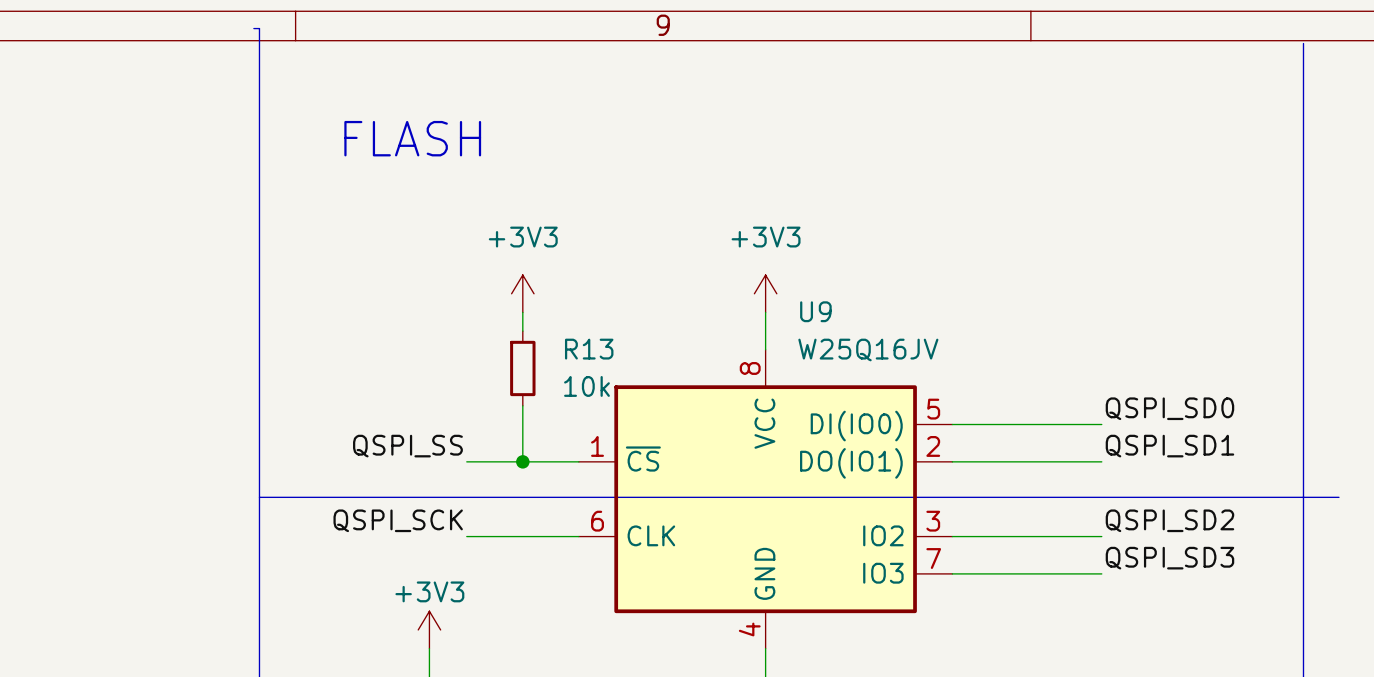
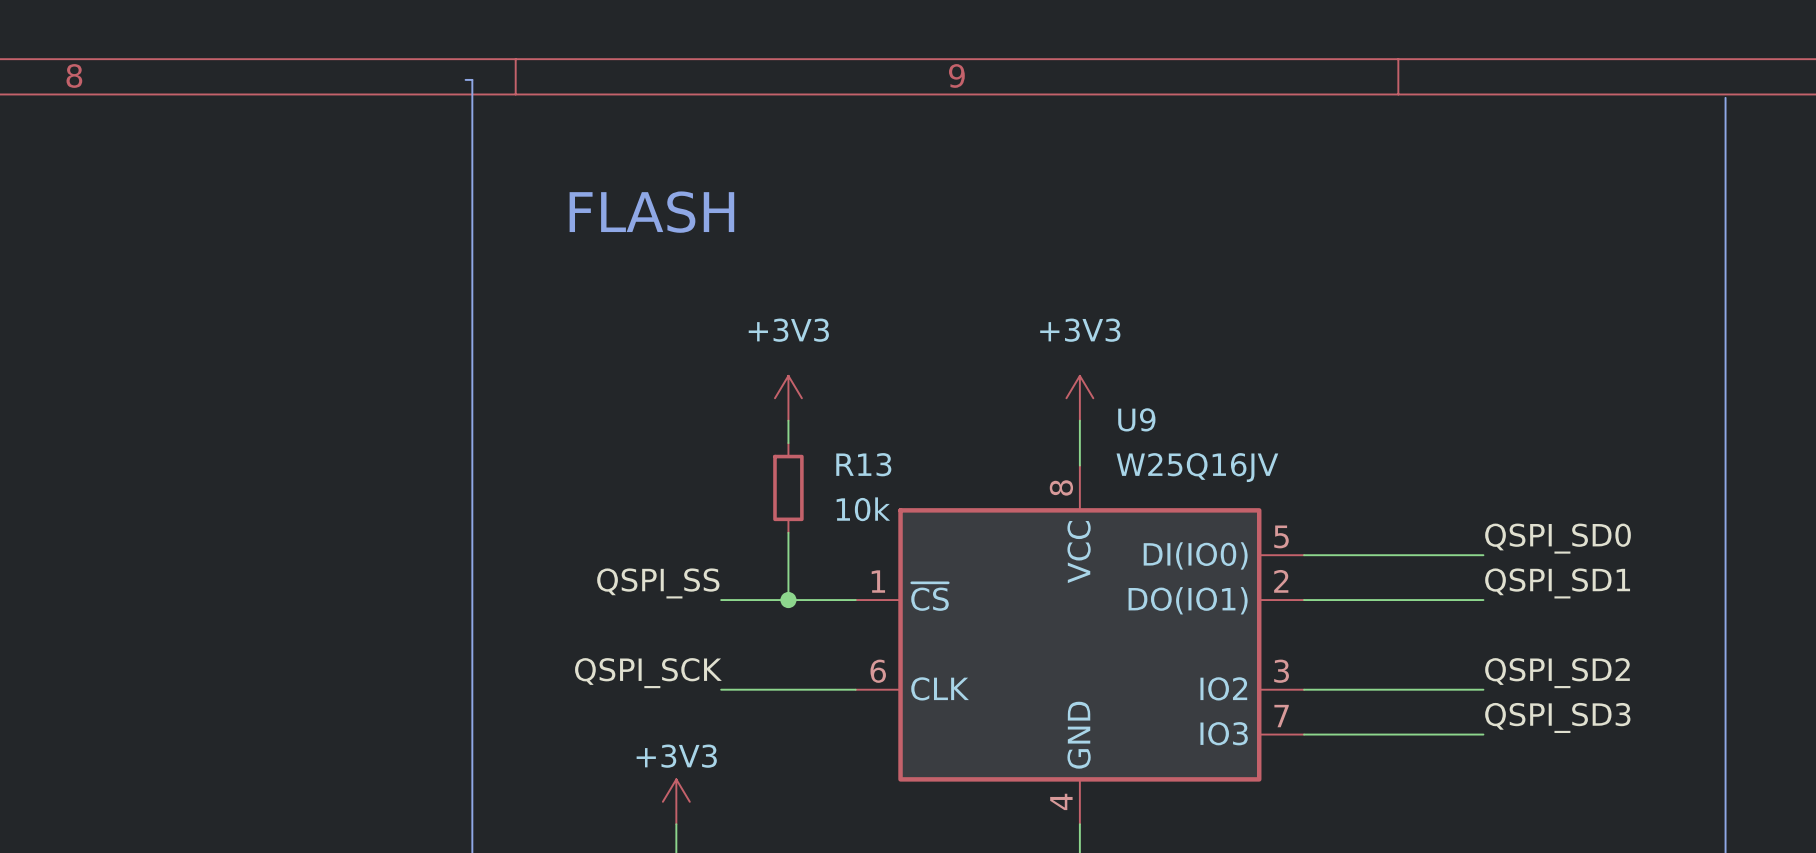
line: (259, 497) (1338, 497) -> none

